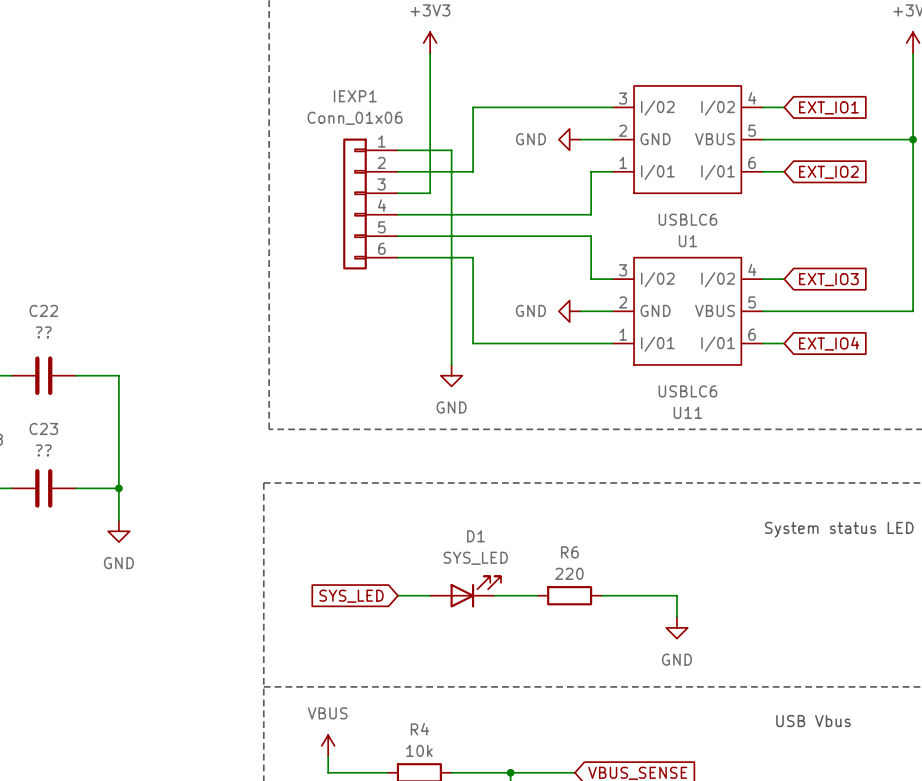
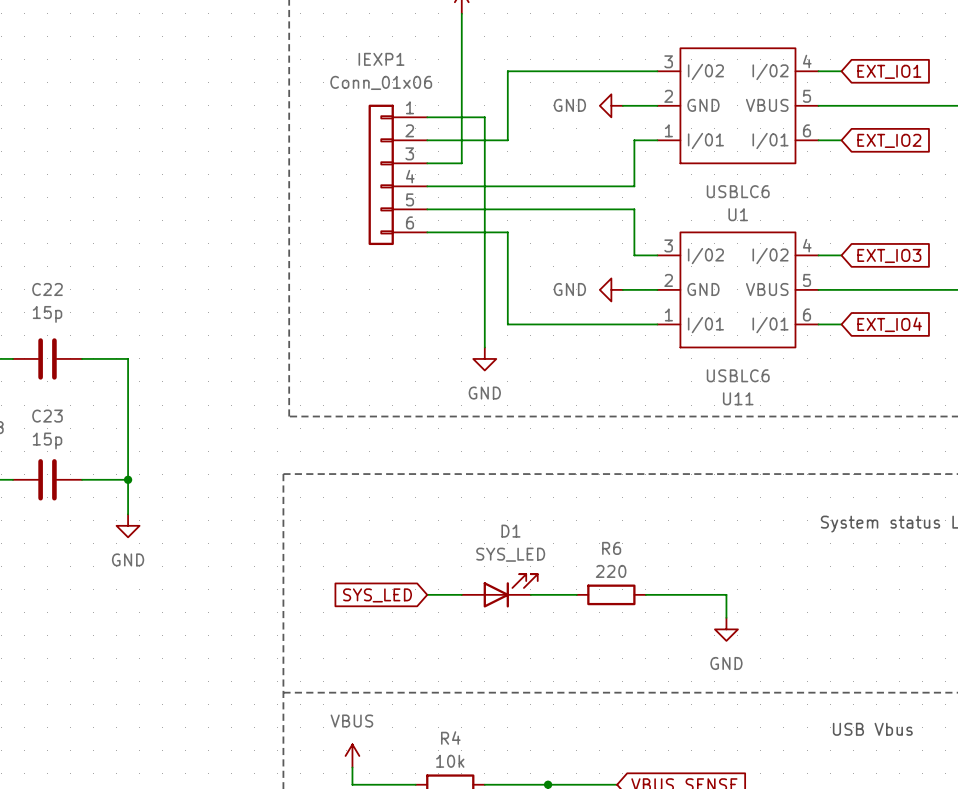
C22 value: ?? (43, 332) -> 15p (47, 314)
C23 value: ?? (43, 450) -> 15p (47, 441)

